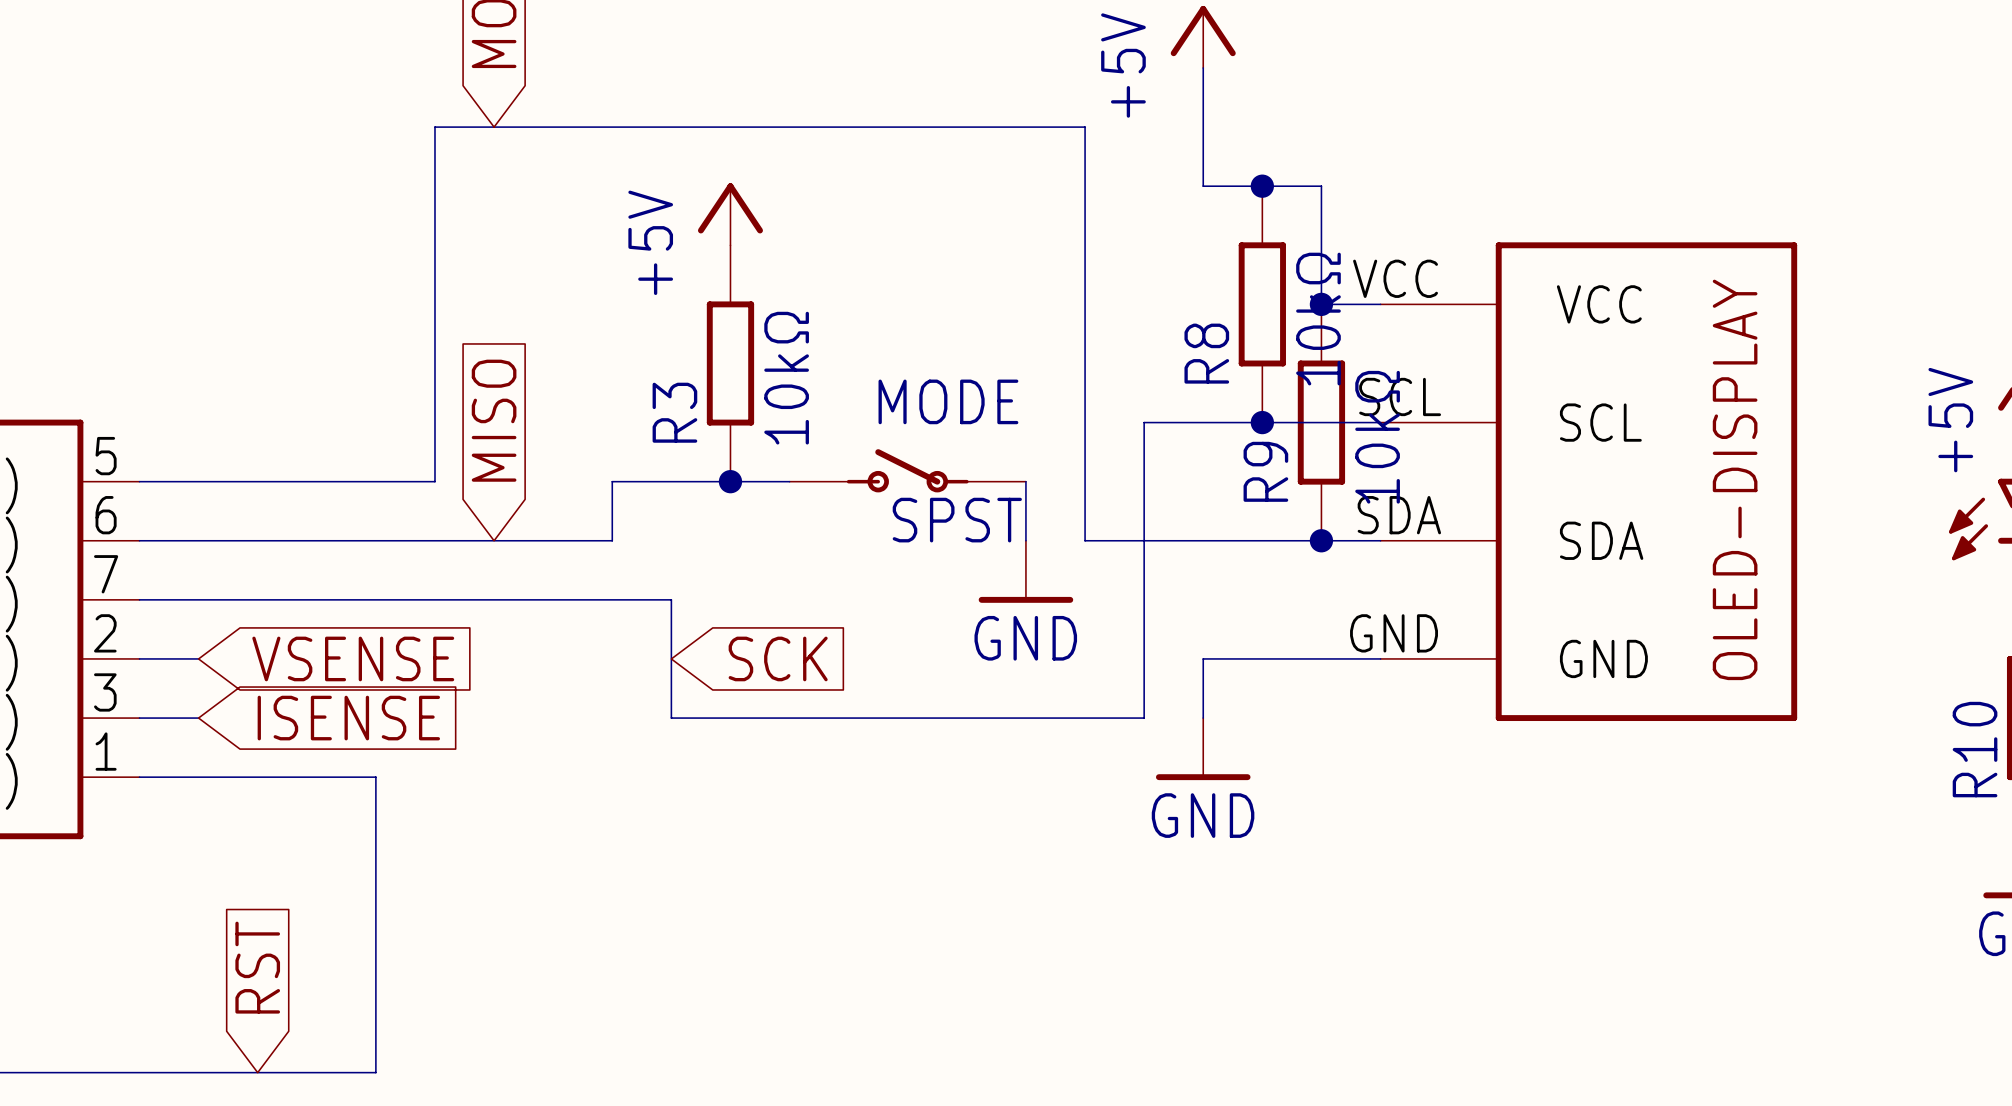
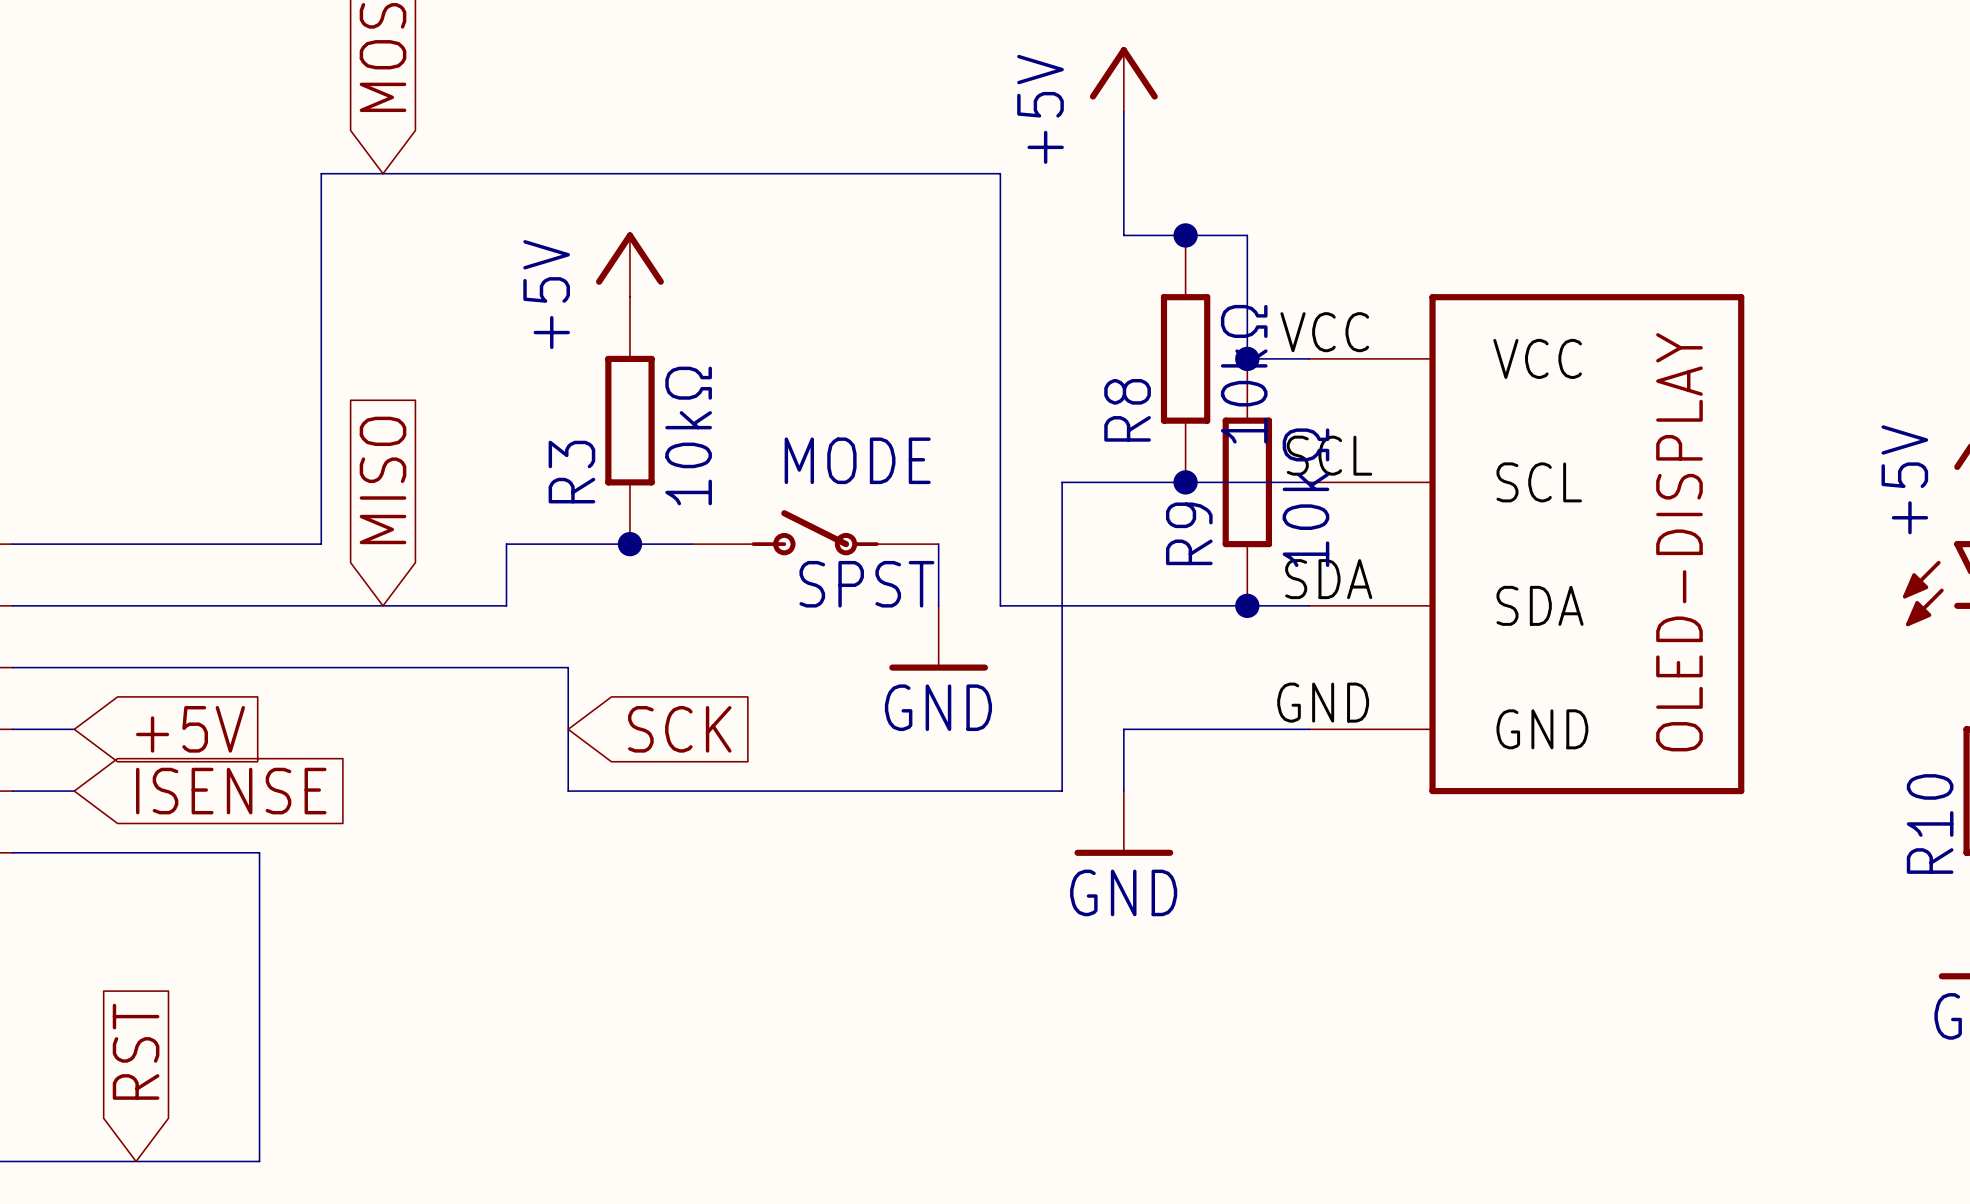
global label: VSENSE (353, 658) -> +5V (190, 729)

